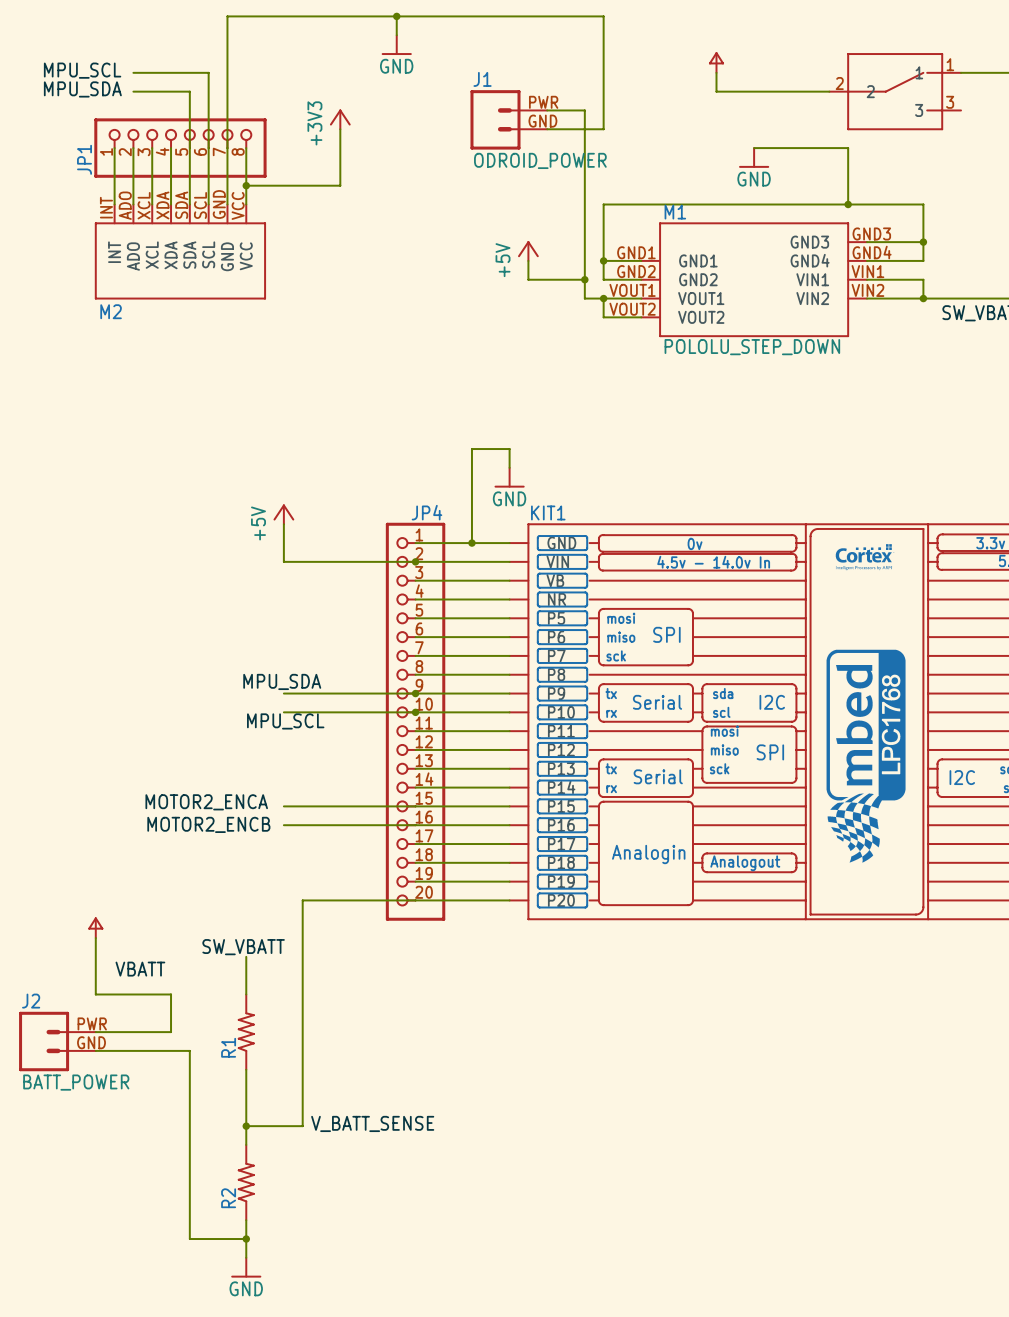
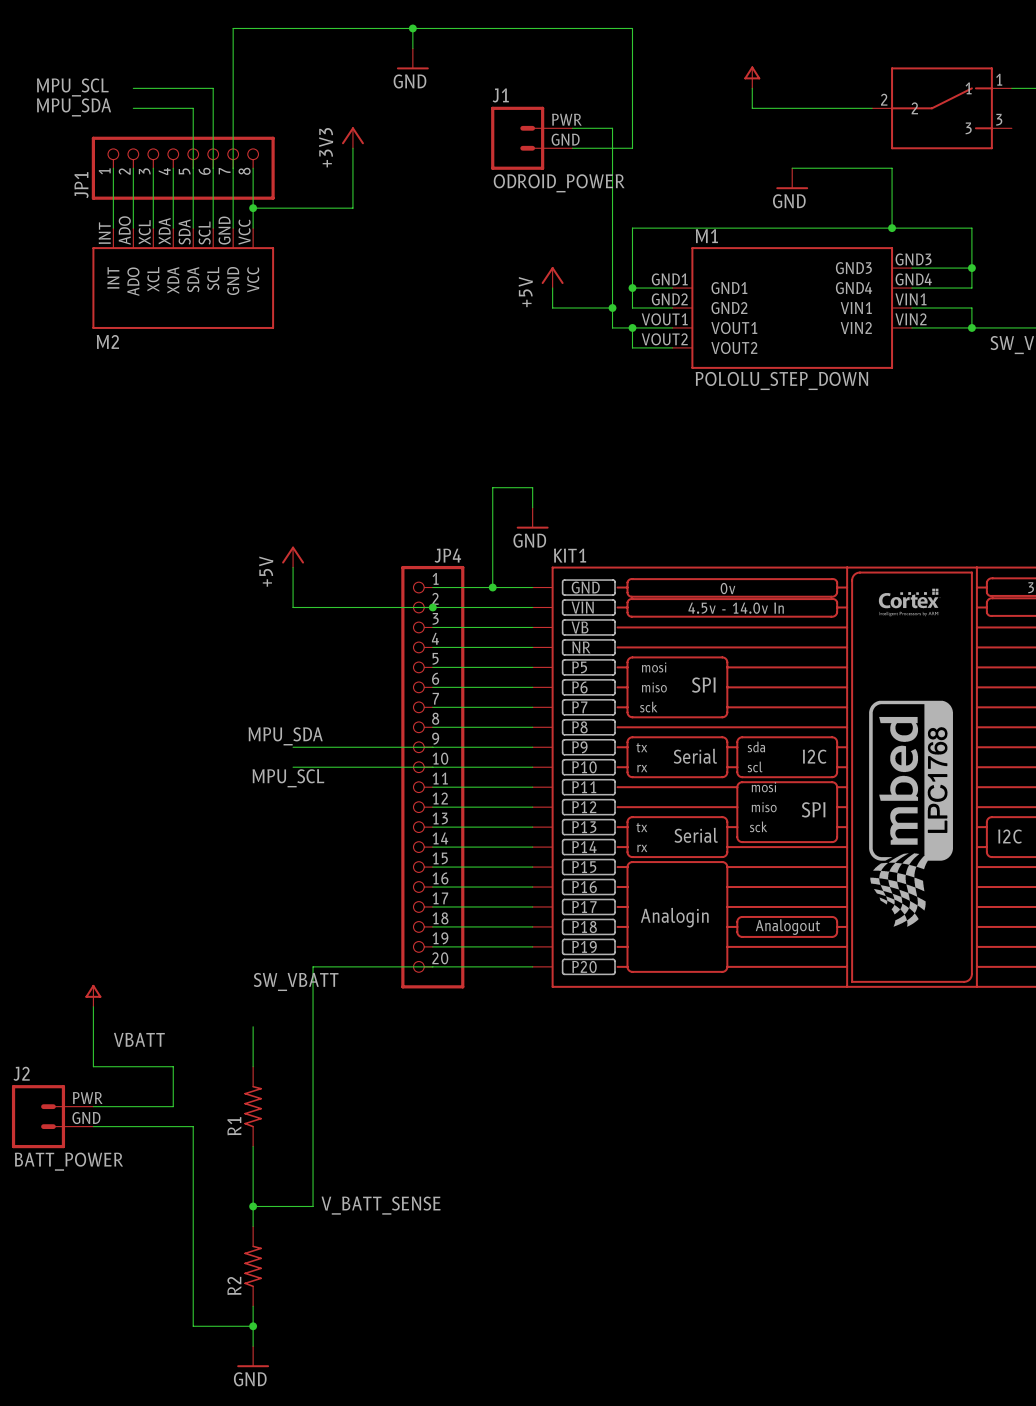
junction: (415, 693) -> none
junction: (415, 712) -> none
label: MOTOR2_ENCA (206, 802) -> none
wire: (283, 806) (415, 806) -> none
label: MOTOR2_ENCB (208, 824) -> none
wire: (283, 825) (415, 825) -> none
label position: SW_VBATT (243, 947) -> SW_VBATT (296, 981)

